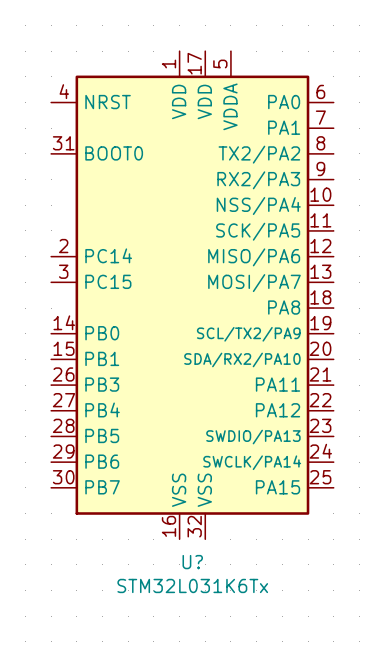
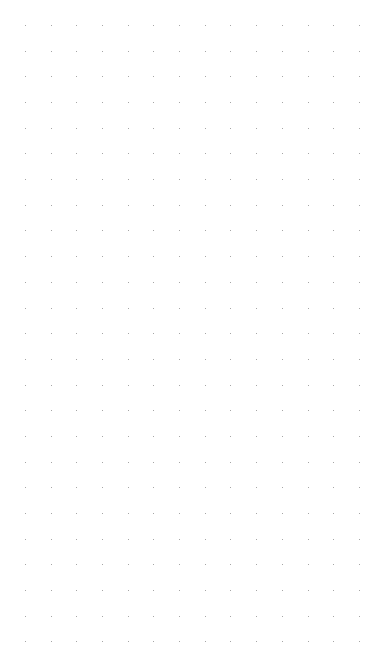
U?: STM32L031K6Tx (192, 295) -> none

